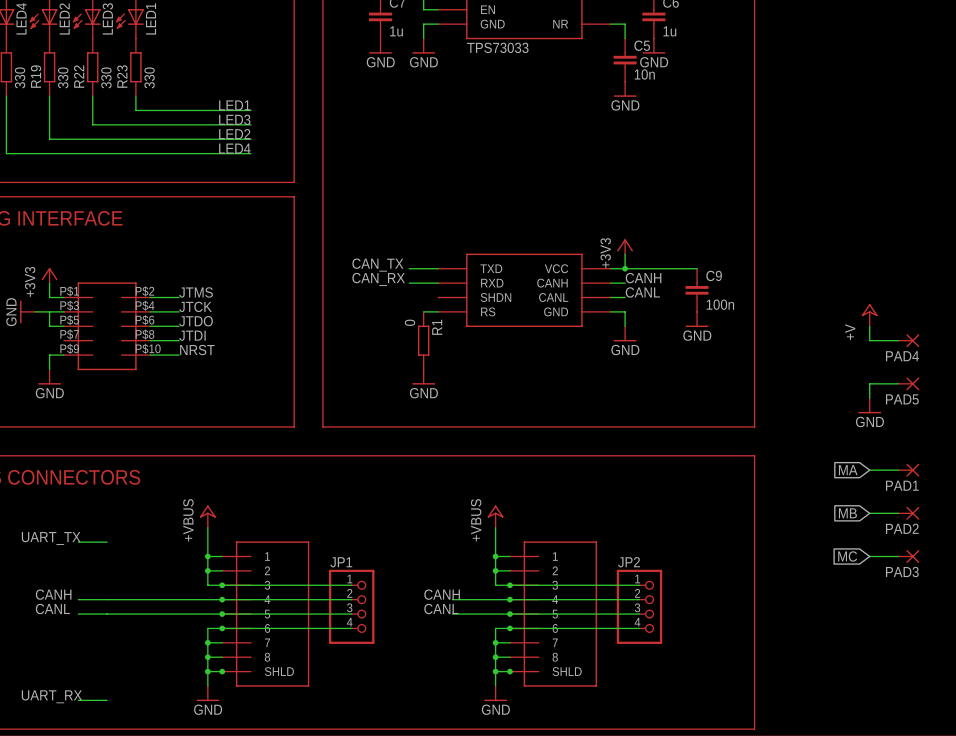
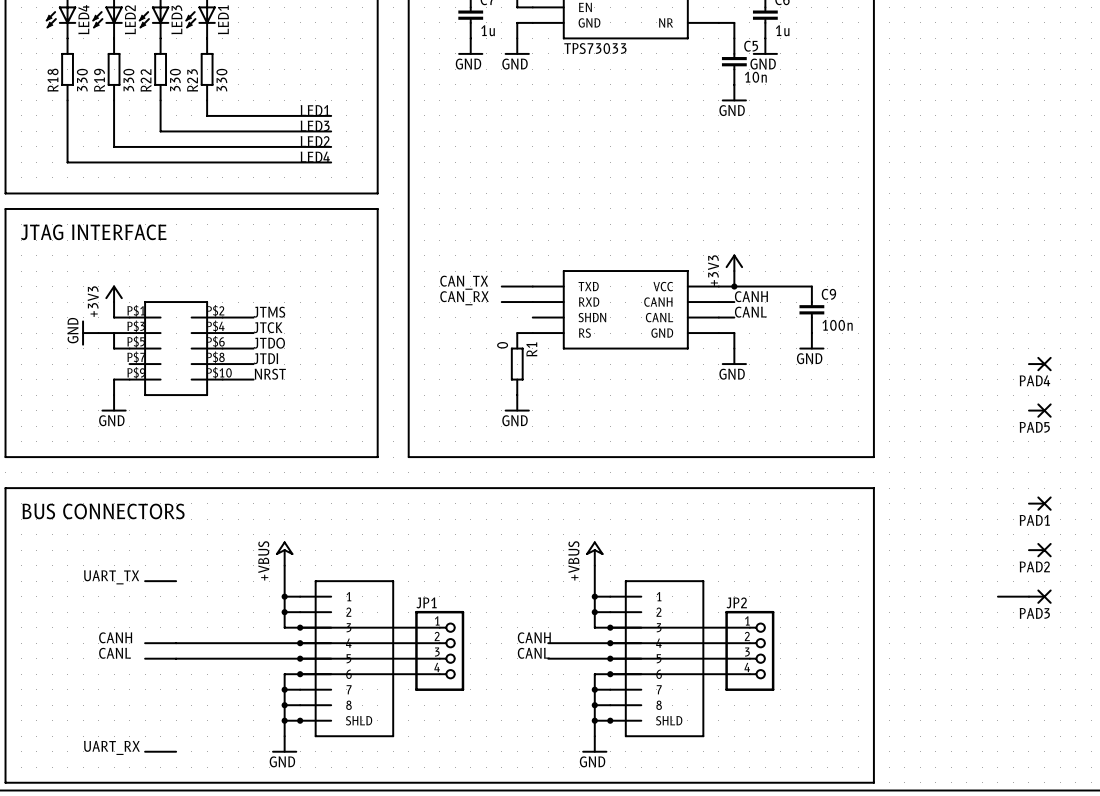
power symbol: +V (869, 315) -> none
wire: (869, 326) (869, 340) (898, 340) -> none
wire: (898, 383) (869, 383) (869, 398) -> none
power symbol: GND (869, 405) -> none
global label: MA (848, 470) -> none
wire: (869, 470) (898, 470) -> none
global label: MB (847, 513) -> none
wire: (869, 513) (898, 513) -> none
global label: MC (847, 556) -> none

